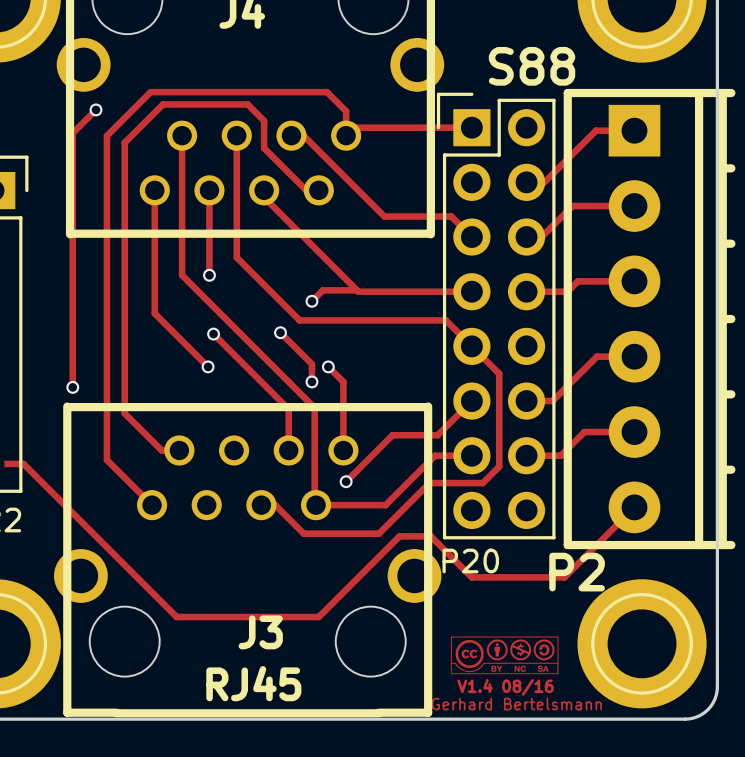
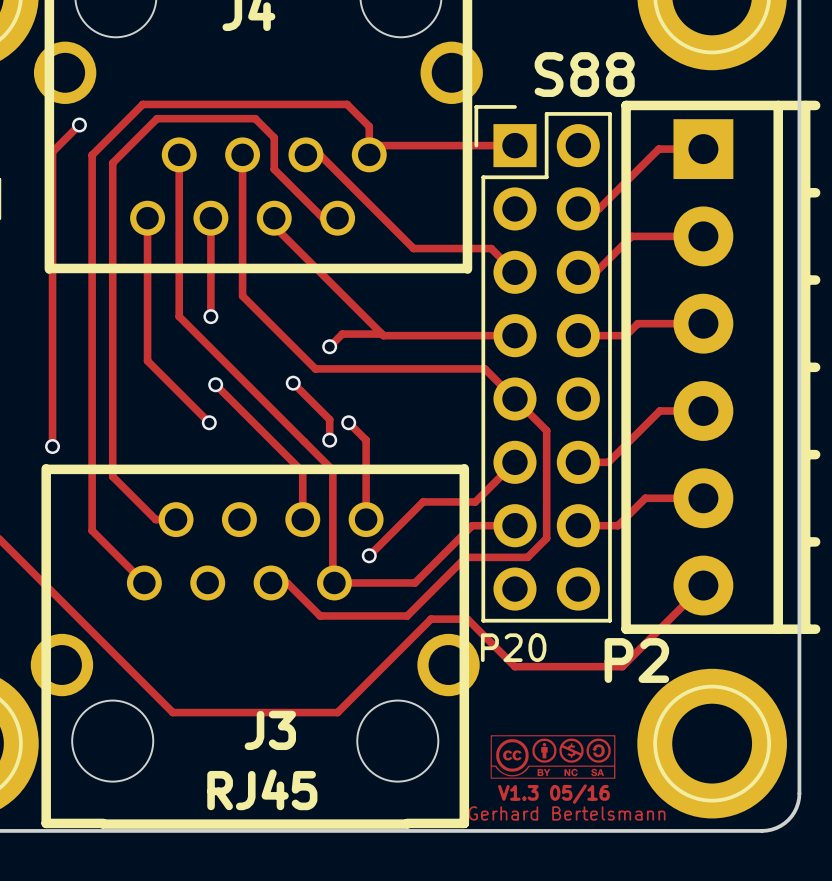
text: V1.4 08/16 (505, 687) -> V1.3 05/16 (553, 794)

